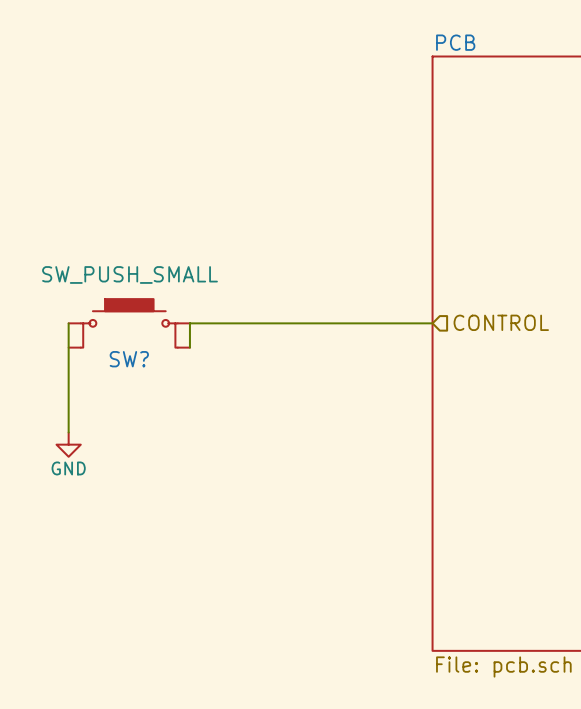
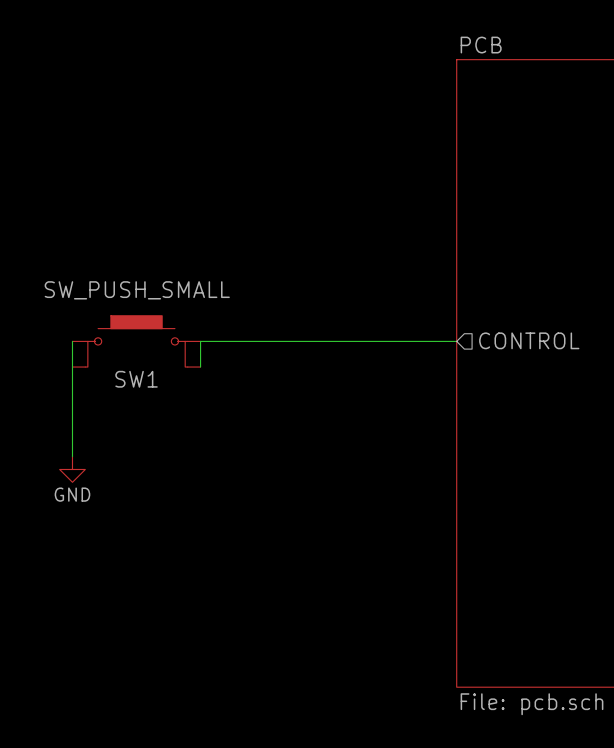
SW? name: SW? (129, 359) -> SW1 (136, 379)

